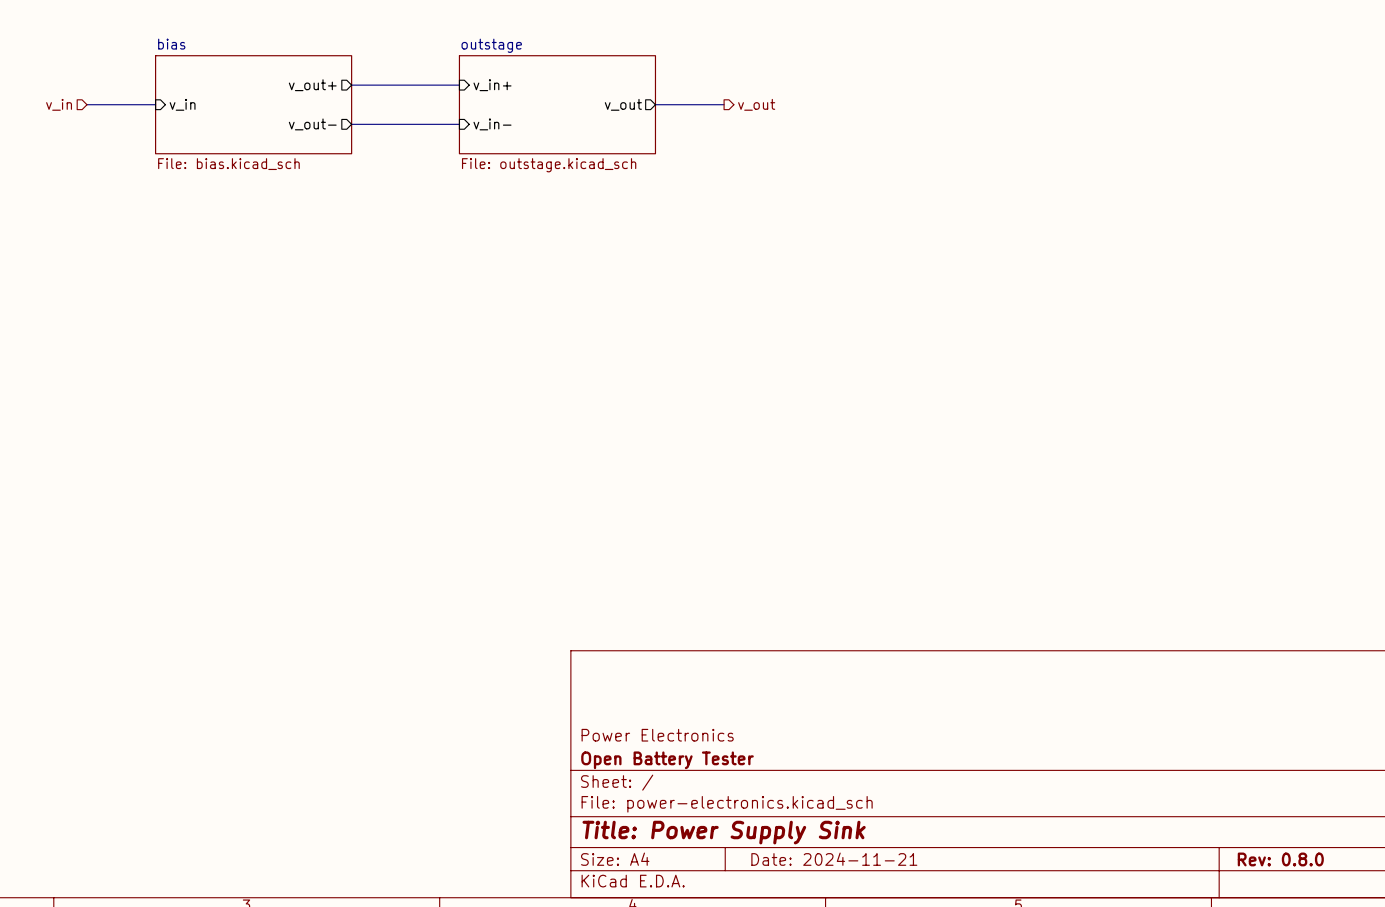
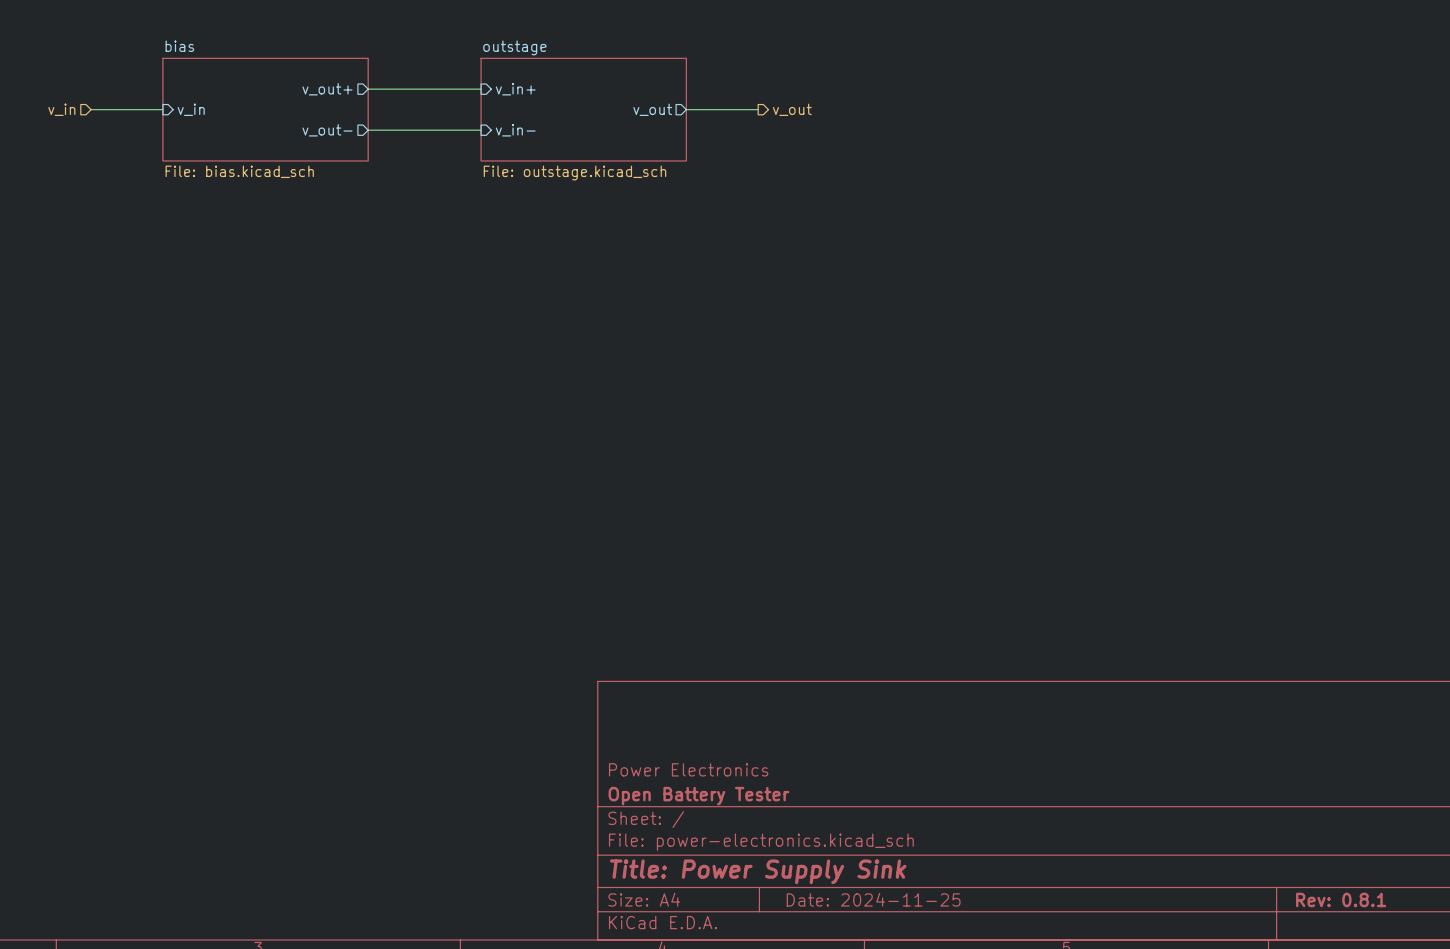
title block: Date: 2024-11-21 (834, 859) -> Date: 2024-11-25 (873, 899)
title block: Rev: 0.8.0 (1280, 859) -> Rev: 0.8.1 (1341, 899)

